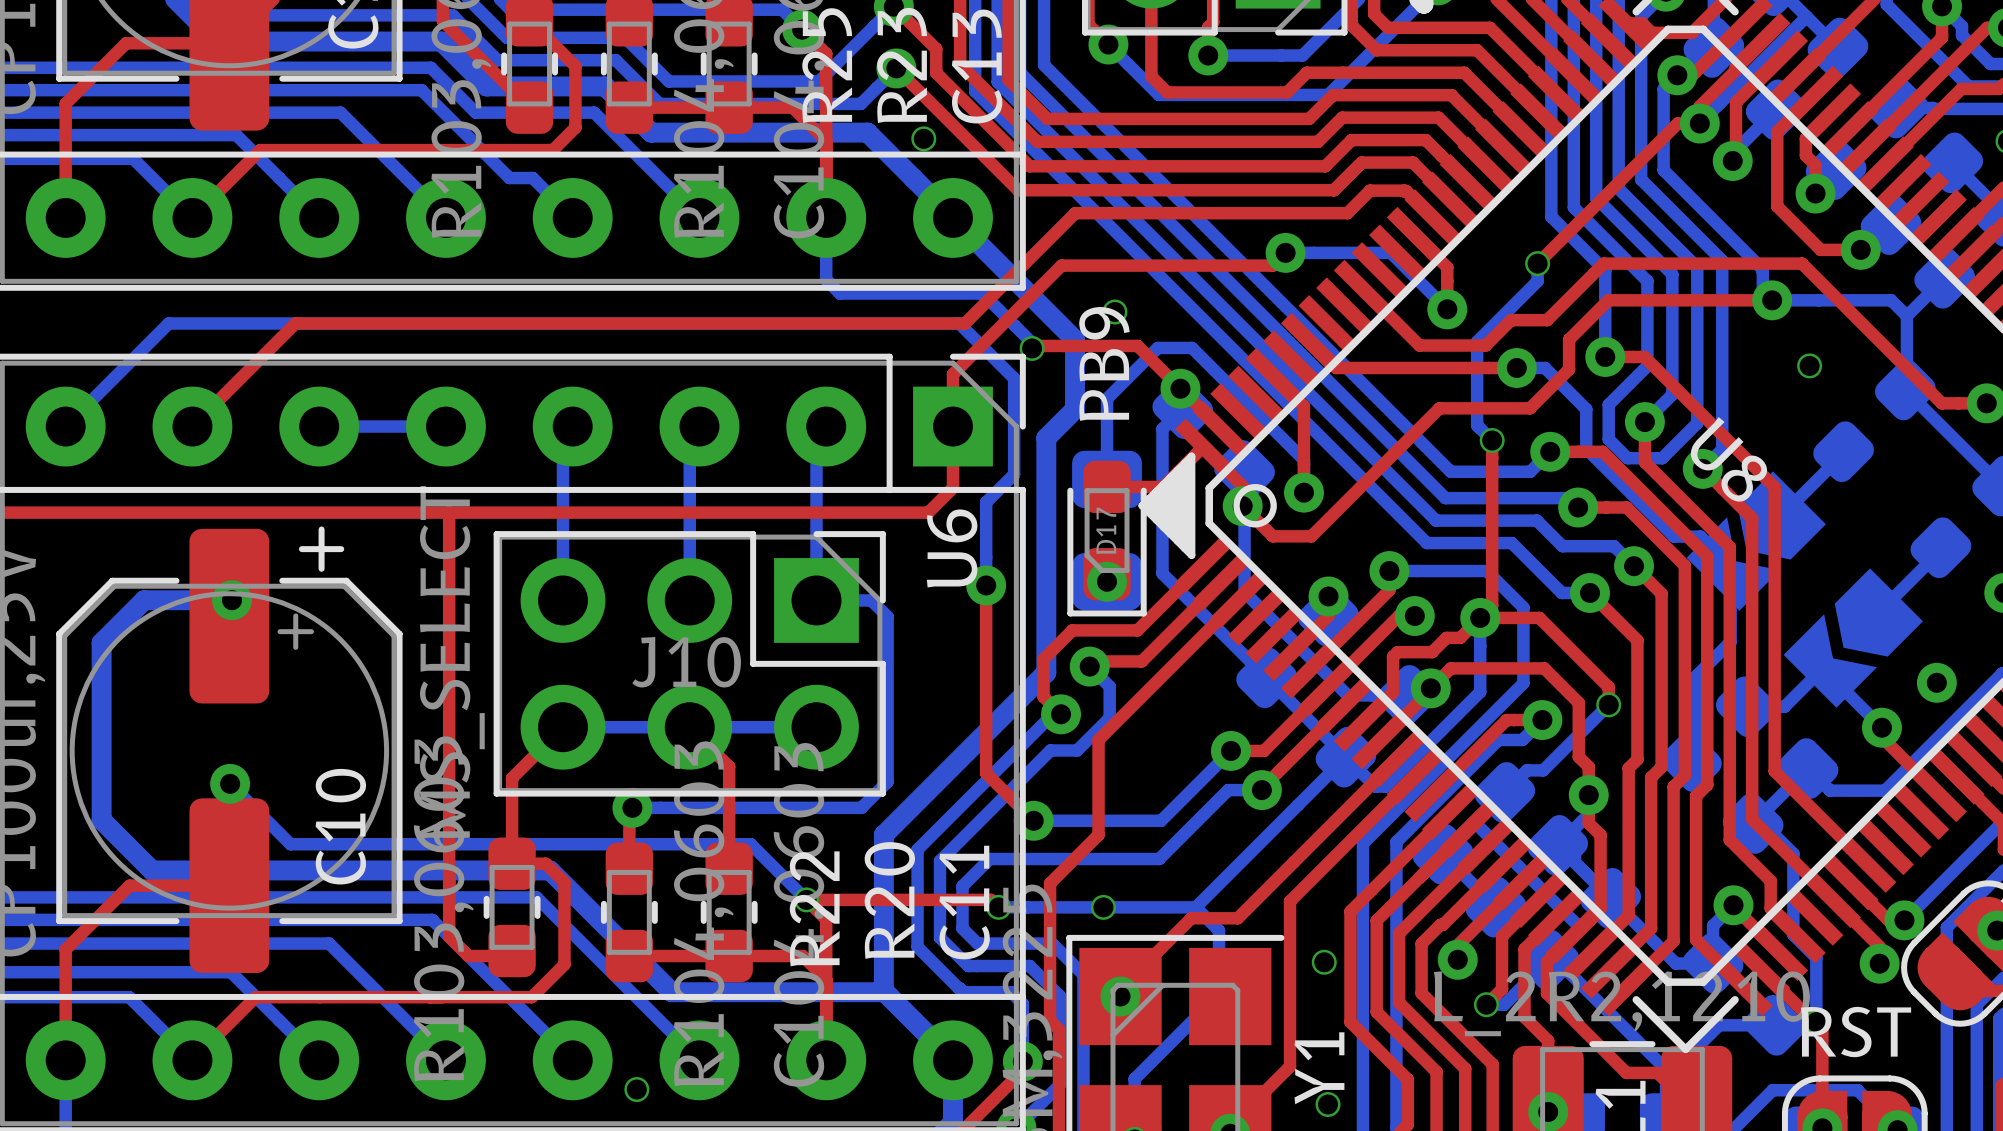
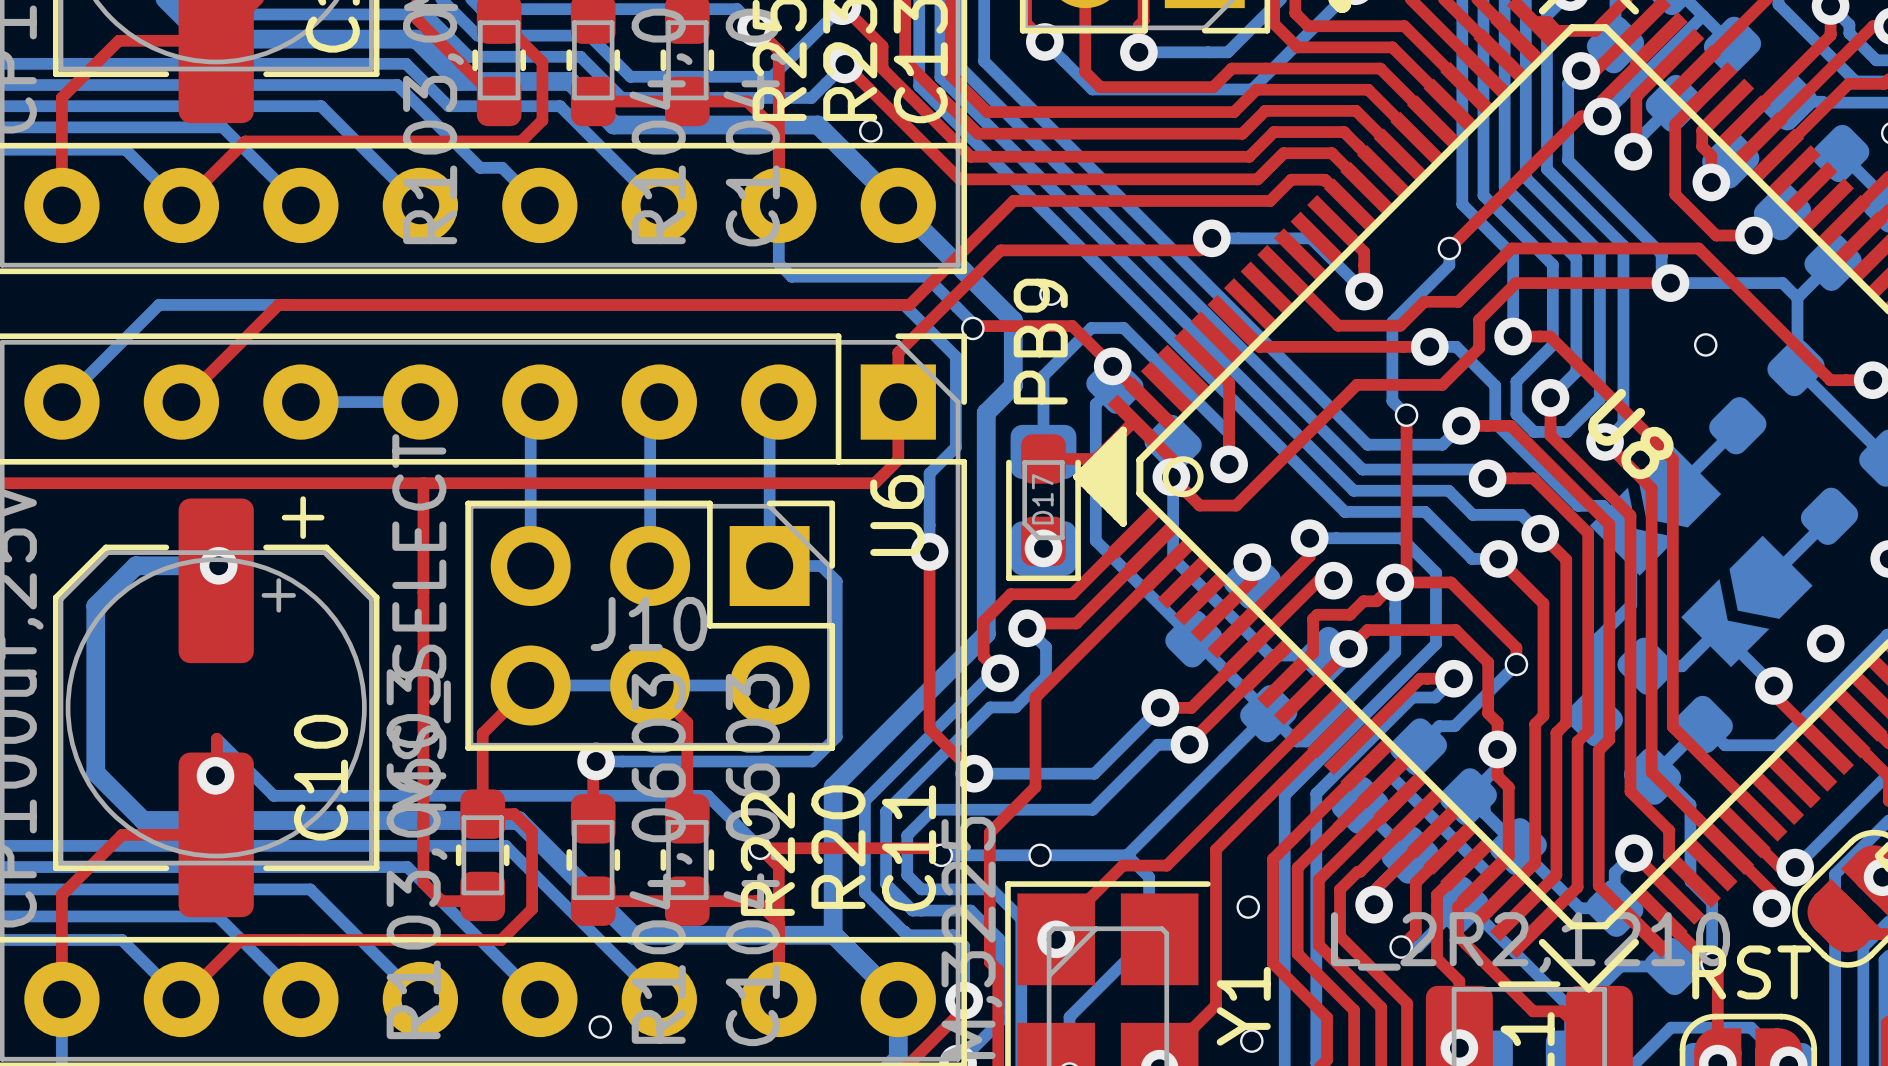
via position: (230, 783) -> (215, 775)

